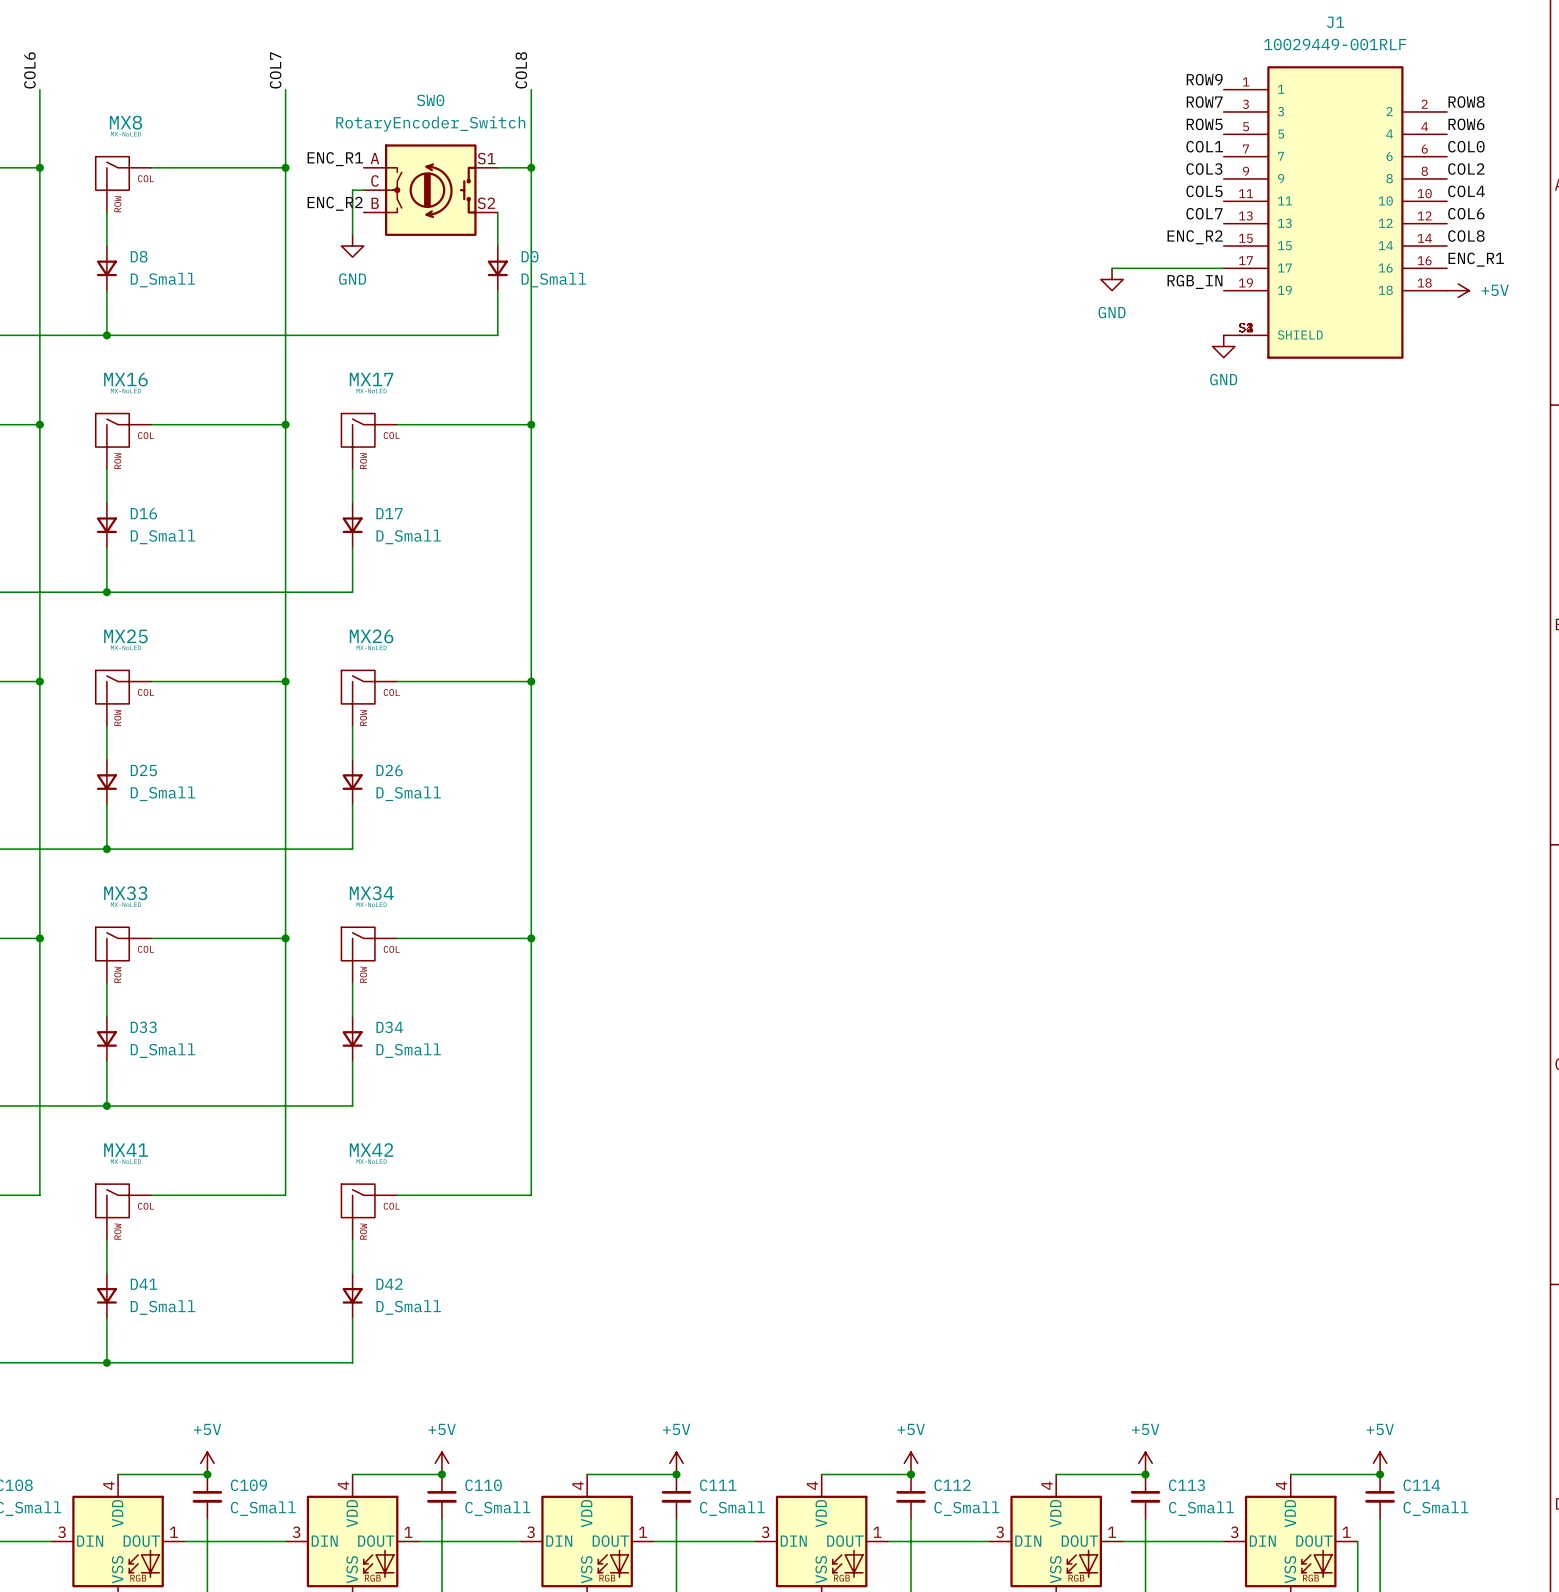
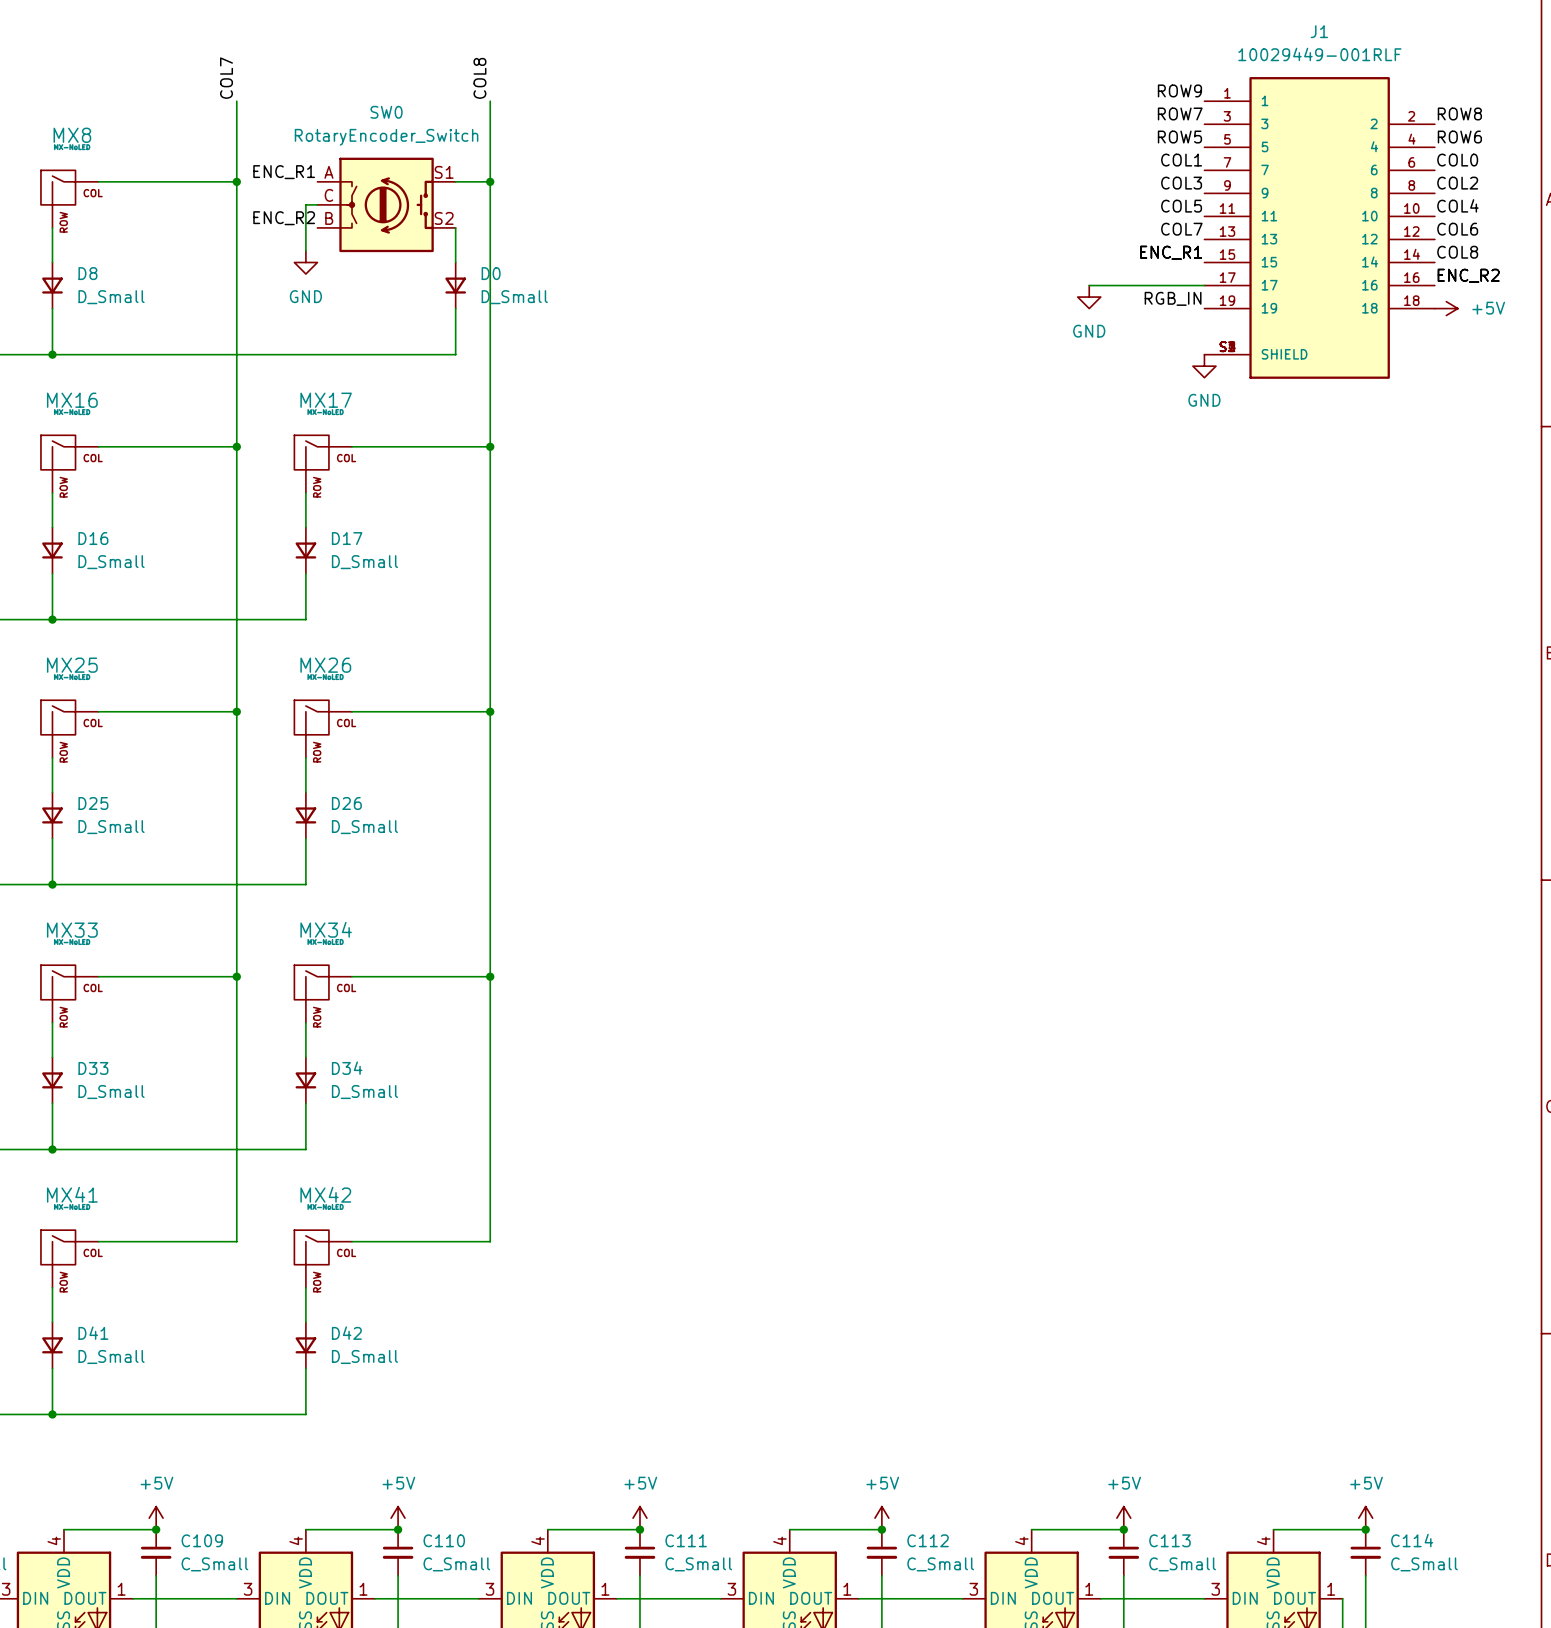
label: ENC_R2 (1195, 237) -> ENC_R1 (1171, 252)
label: ENC_R1 (1476, 259) -> ENC_R2 (1468, 275)

